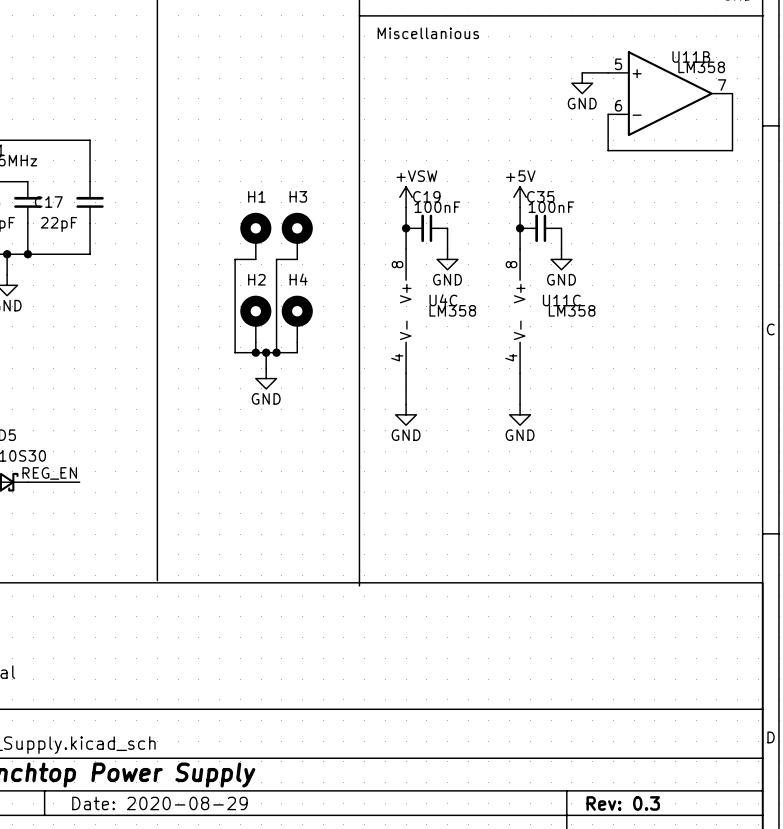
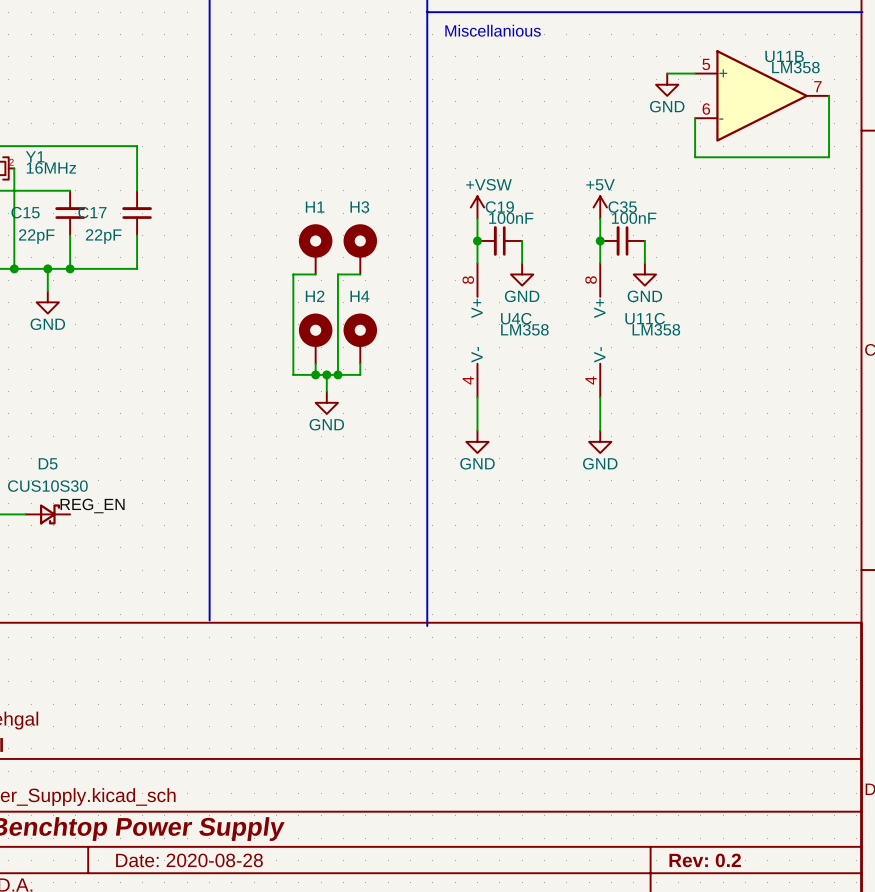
wire: (27, 482) (79, 482) -> none
title block: Date: 2020-08-29 (159, 803) -> Date: 2020-08-28 (189, 860)
title block: Rev: 0.3 (623, 803) -> Rev: 0.2 (705, 860)

